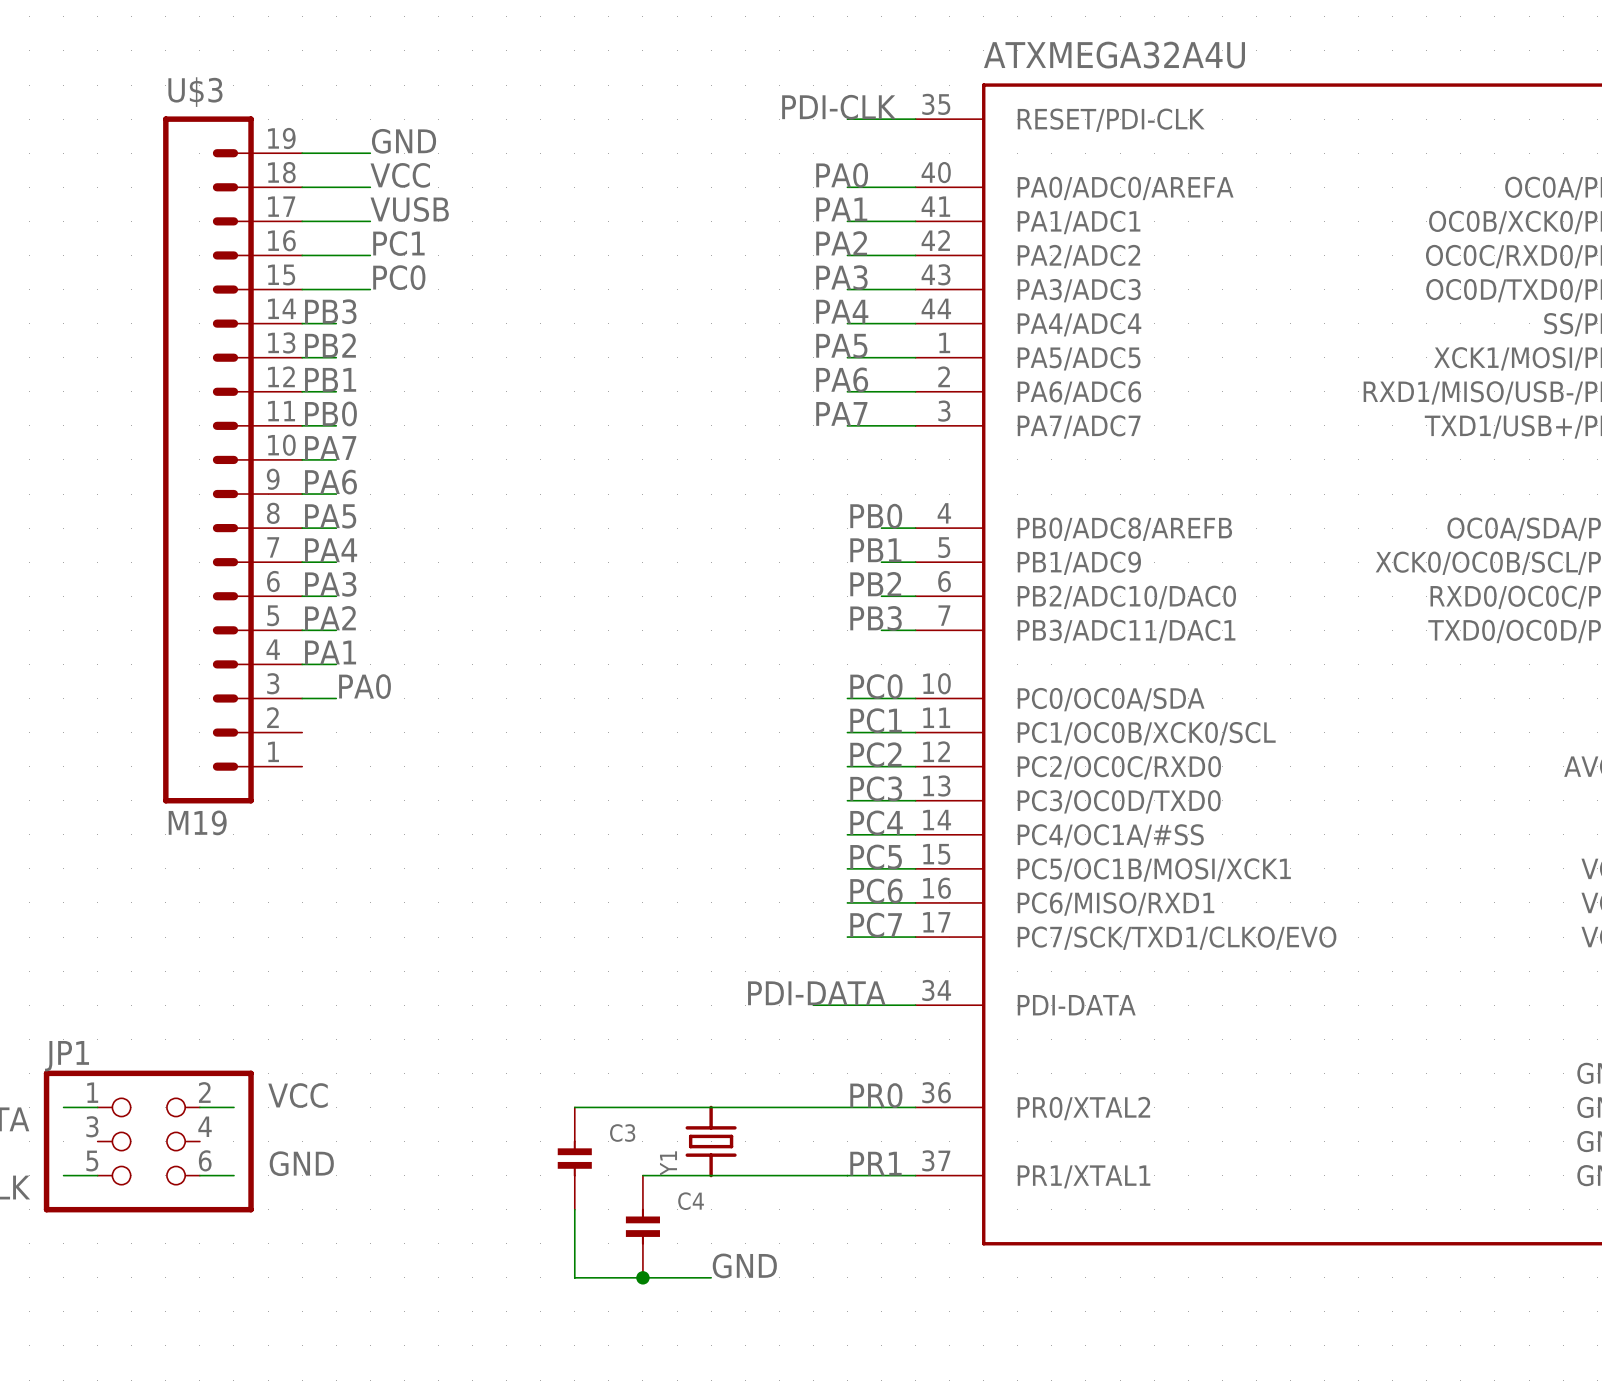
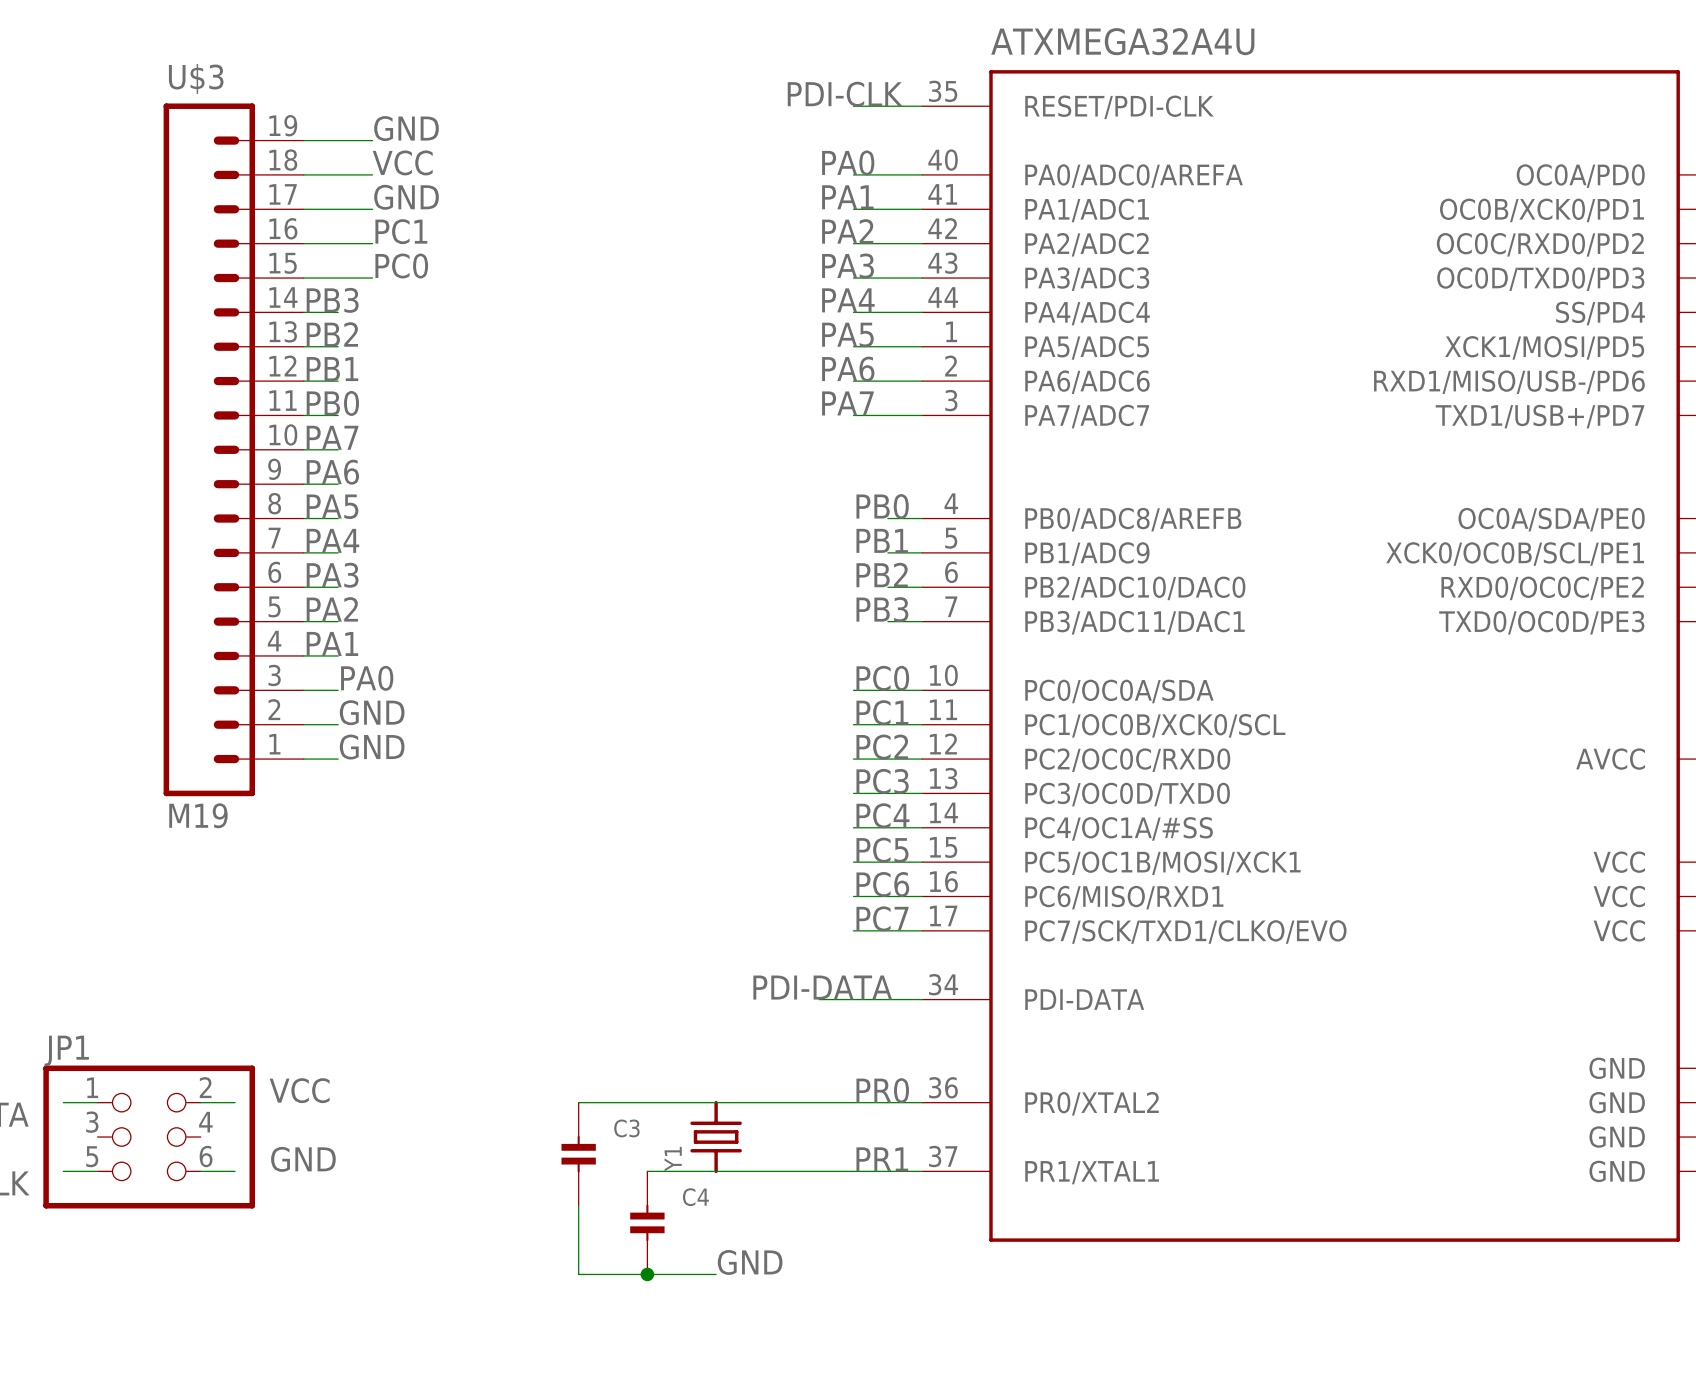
label: VUSB (409, 209) -> GND (406, 197)
label: none -> GND (372, 712)
wire: none -> (303, 724) (338, 724)
label: none -> GND (372, 747)
wire: none -> (303, 759) (338, 759)

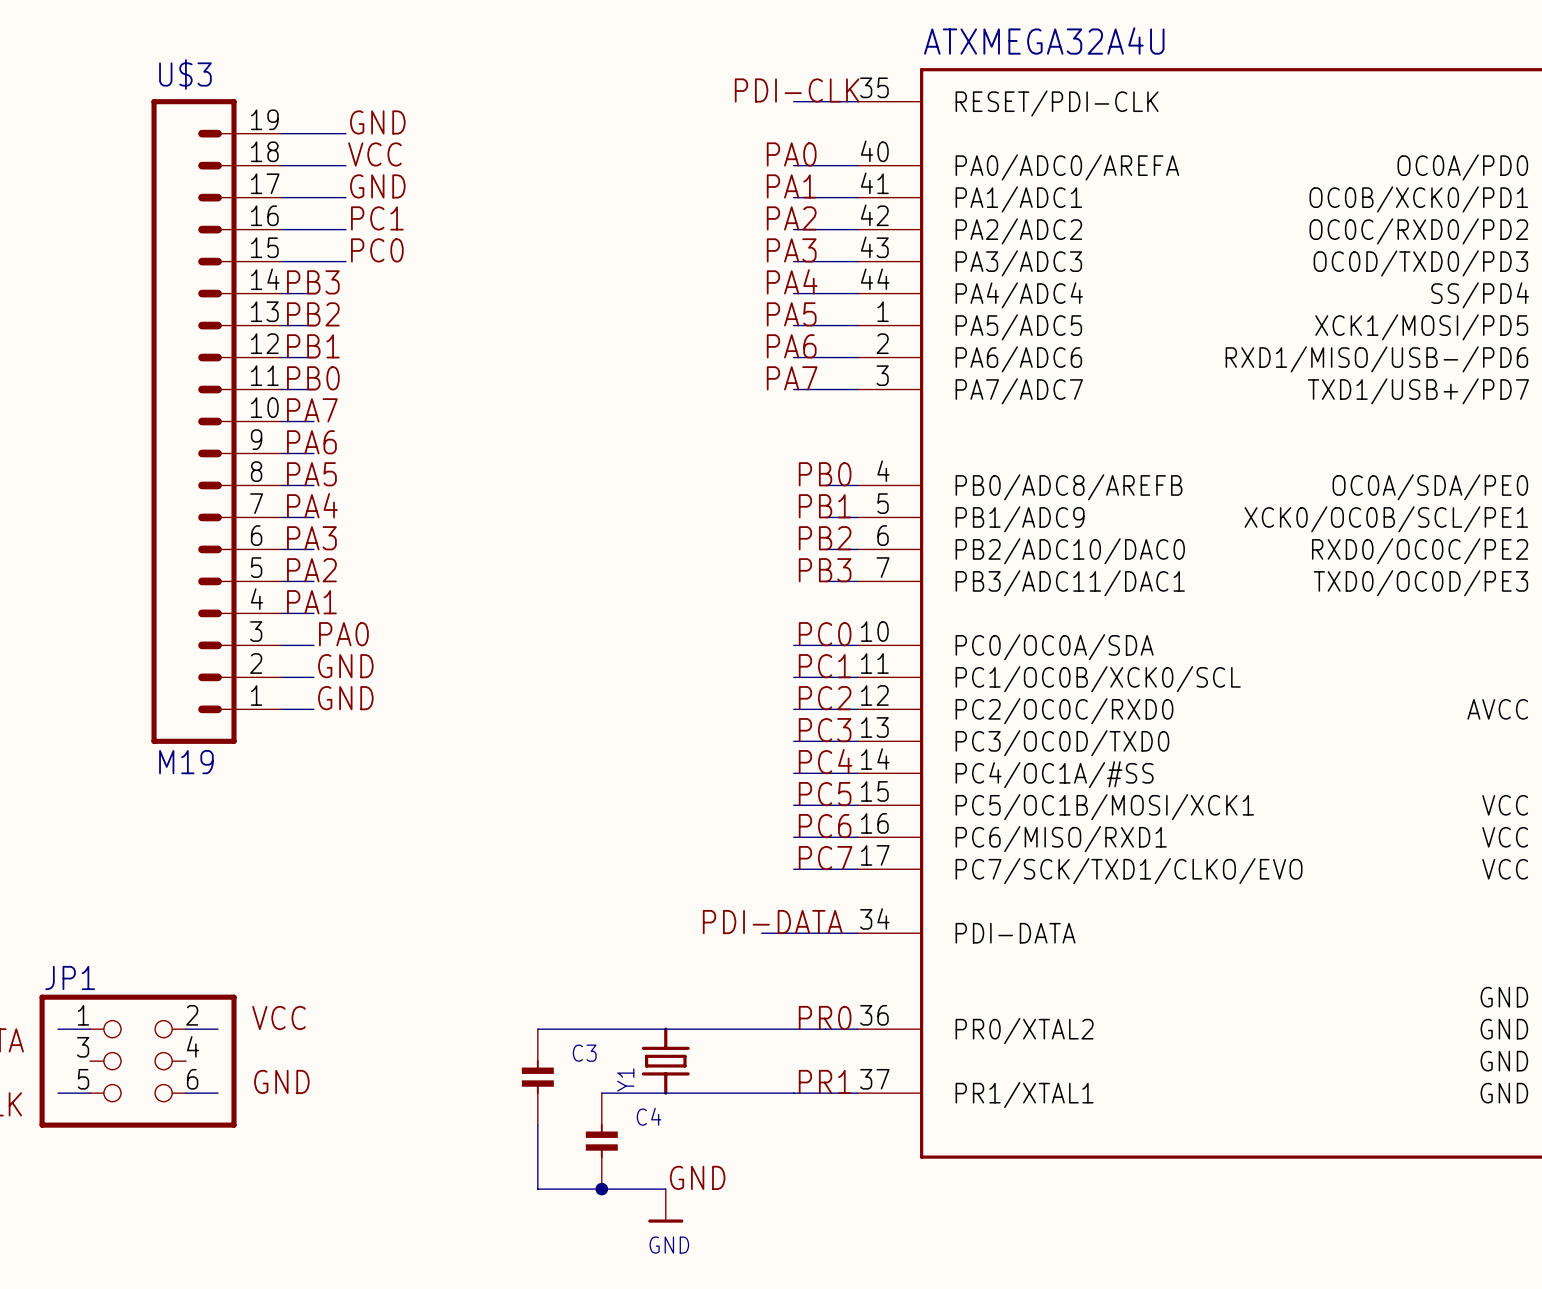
power symbol: none -> GND (665, 1205)

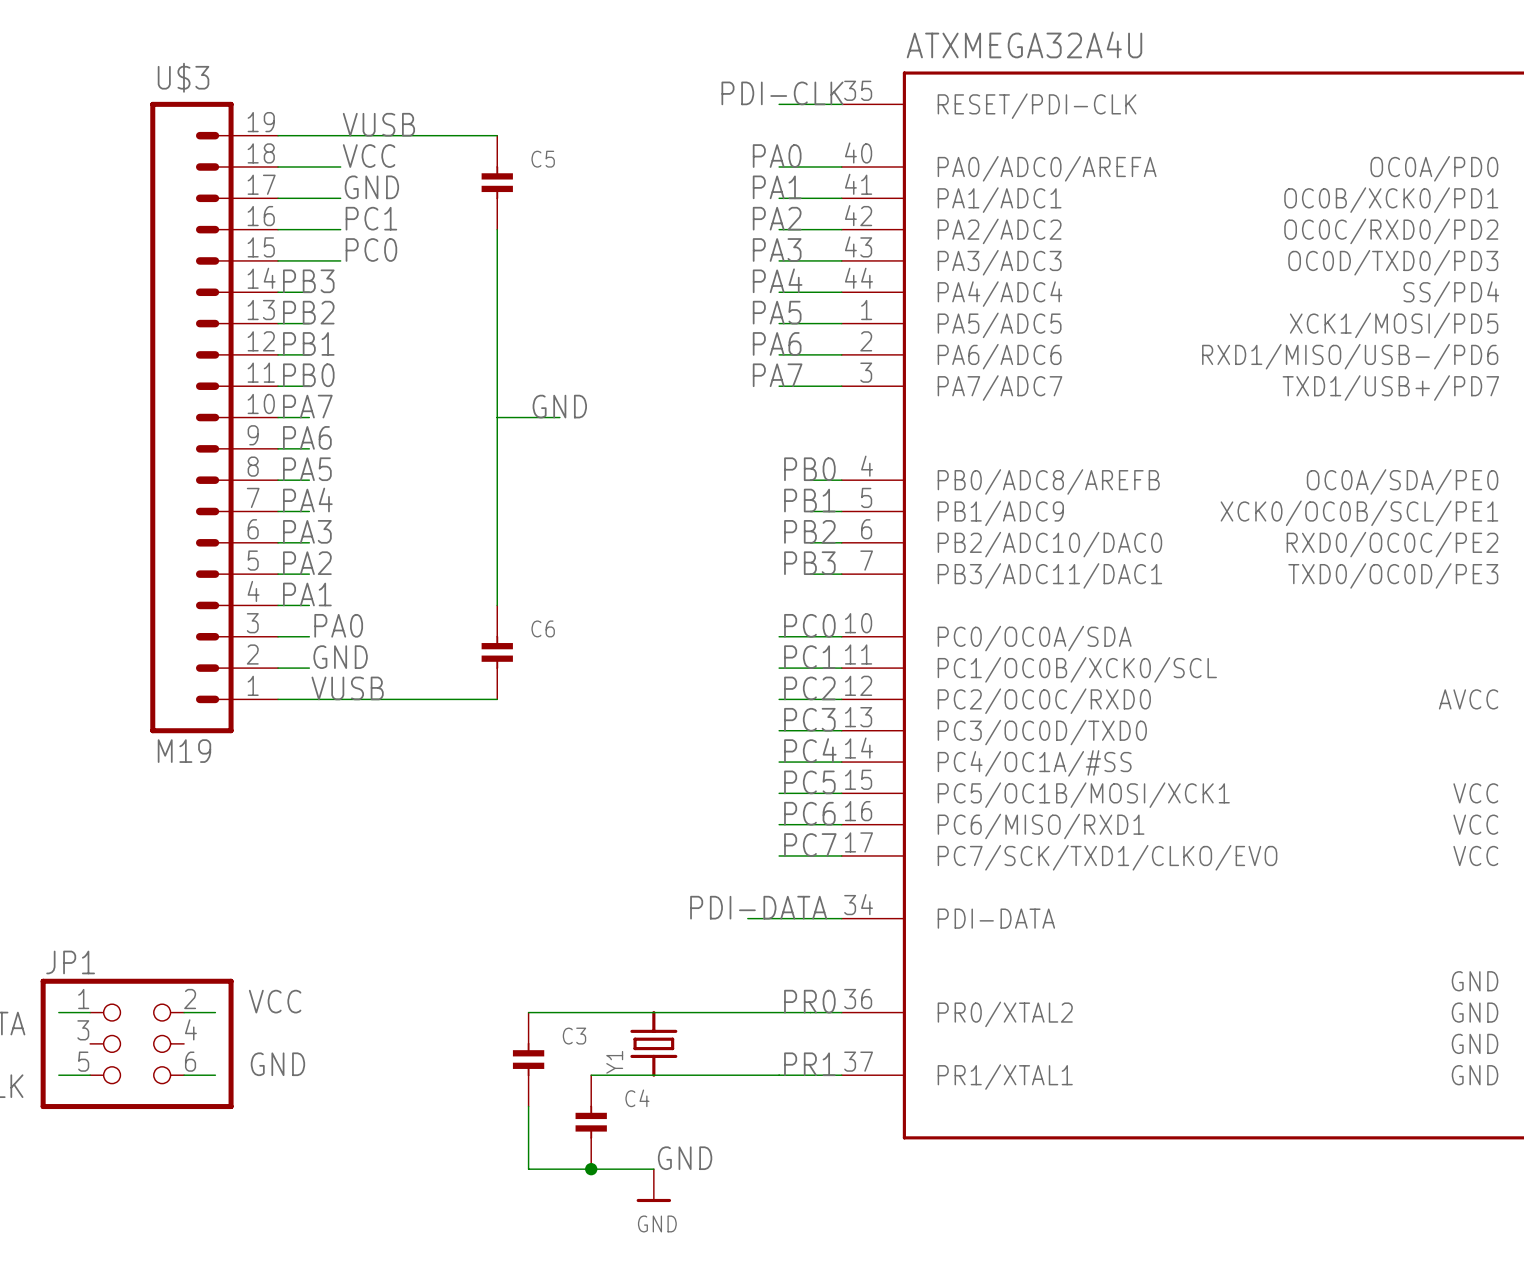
label: GND (377, 122) -> VUSB (378, 124)
wire: none -> (340, 135) (497, 135)
C5: none -> (497, 182)
wire: none -> (497, 229) (497, 605)
label: none -> GND (559, 406)
wire: none -> (497, 417) (559, 417)
C6: none -> (497, 652)
label: GND (345, 698) -> VUSB (347, 688)
wire: none -> (309, 699) (497, 699)

